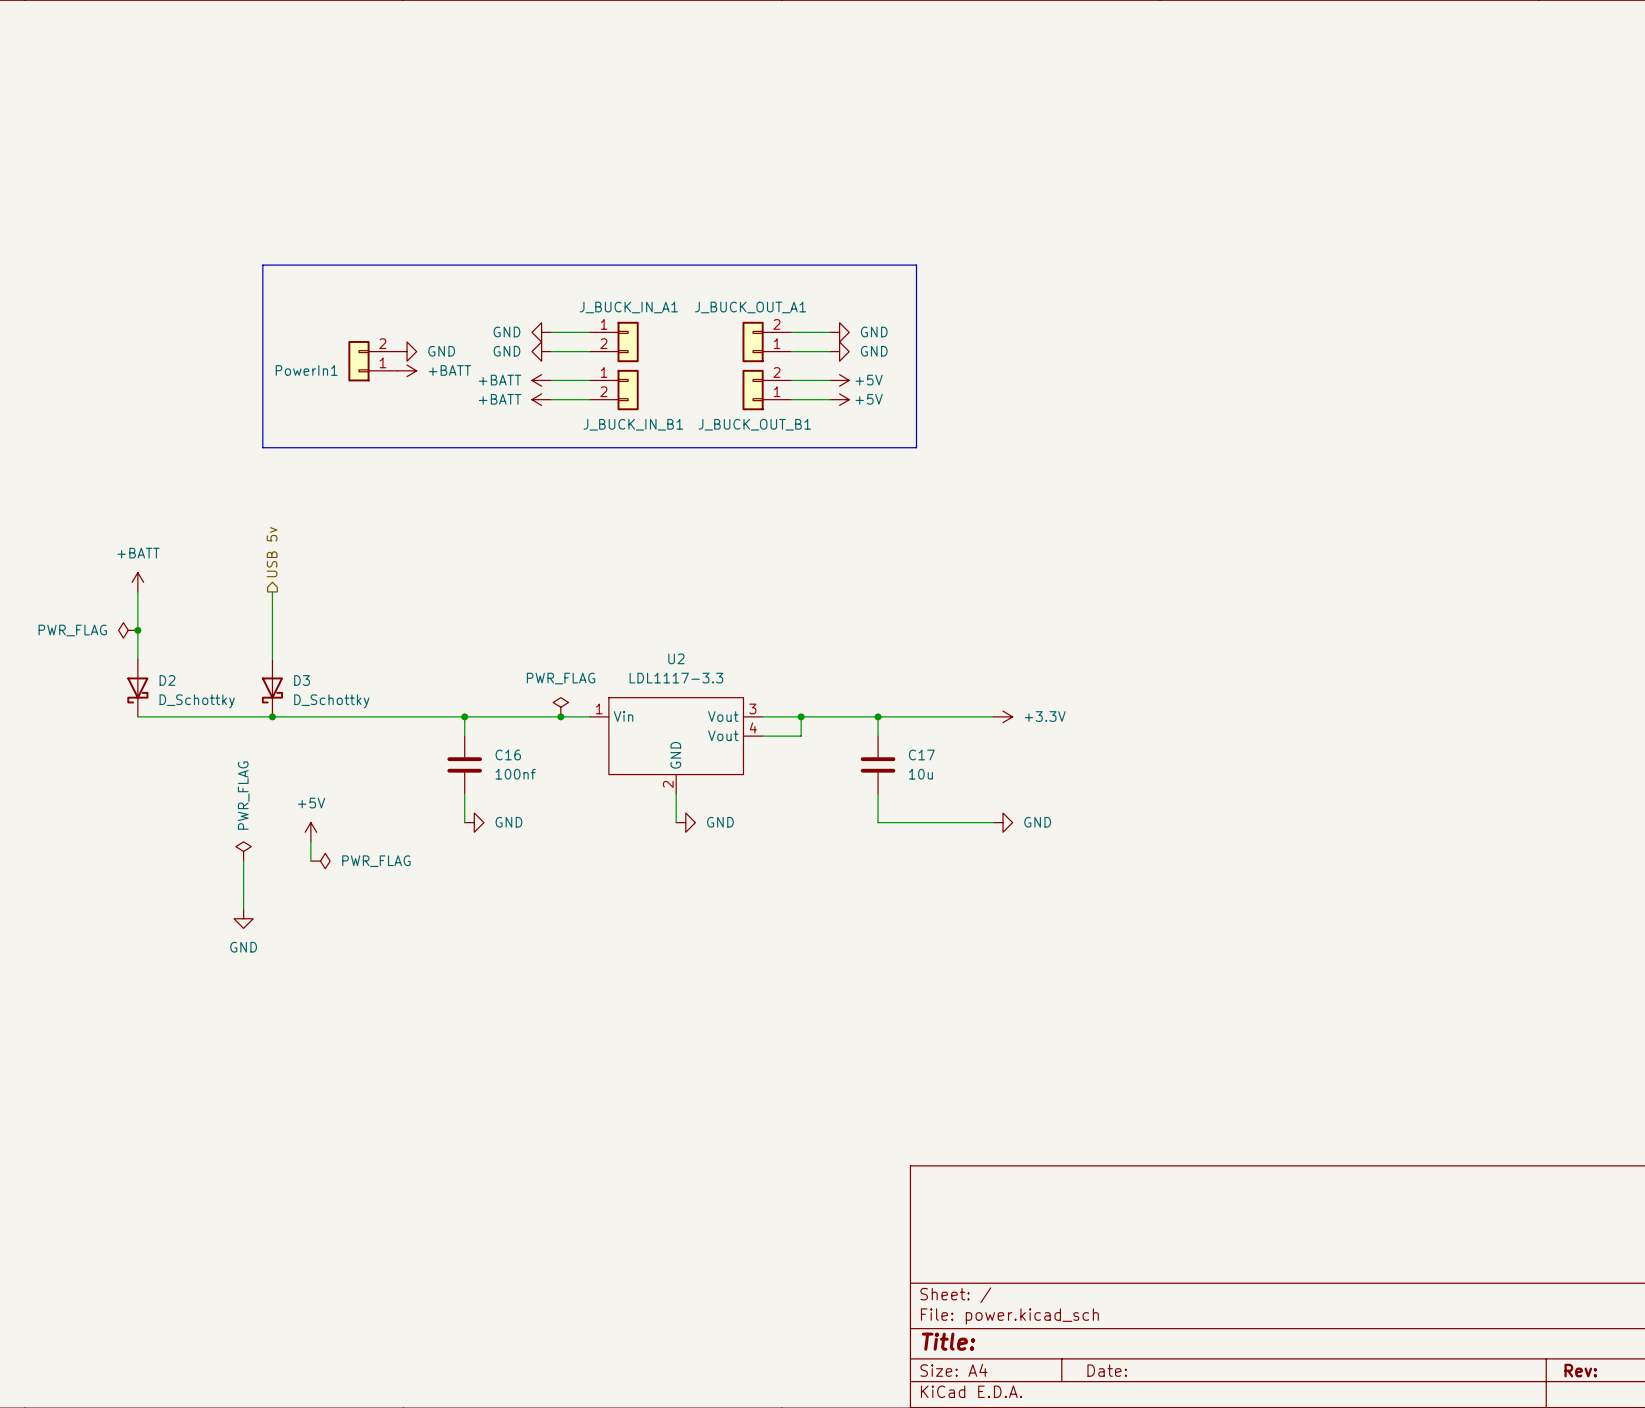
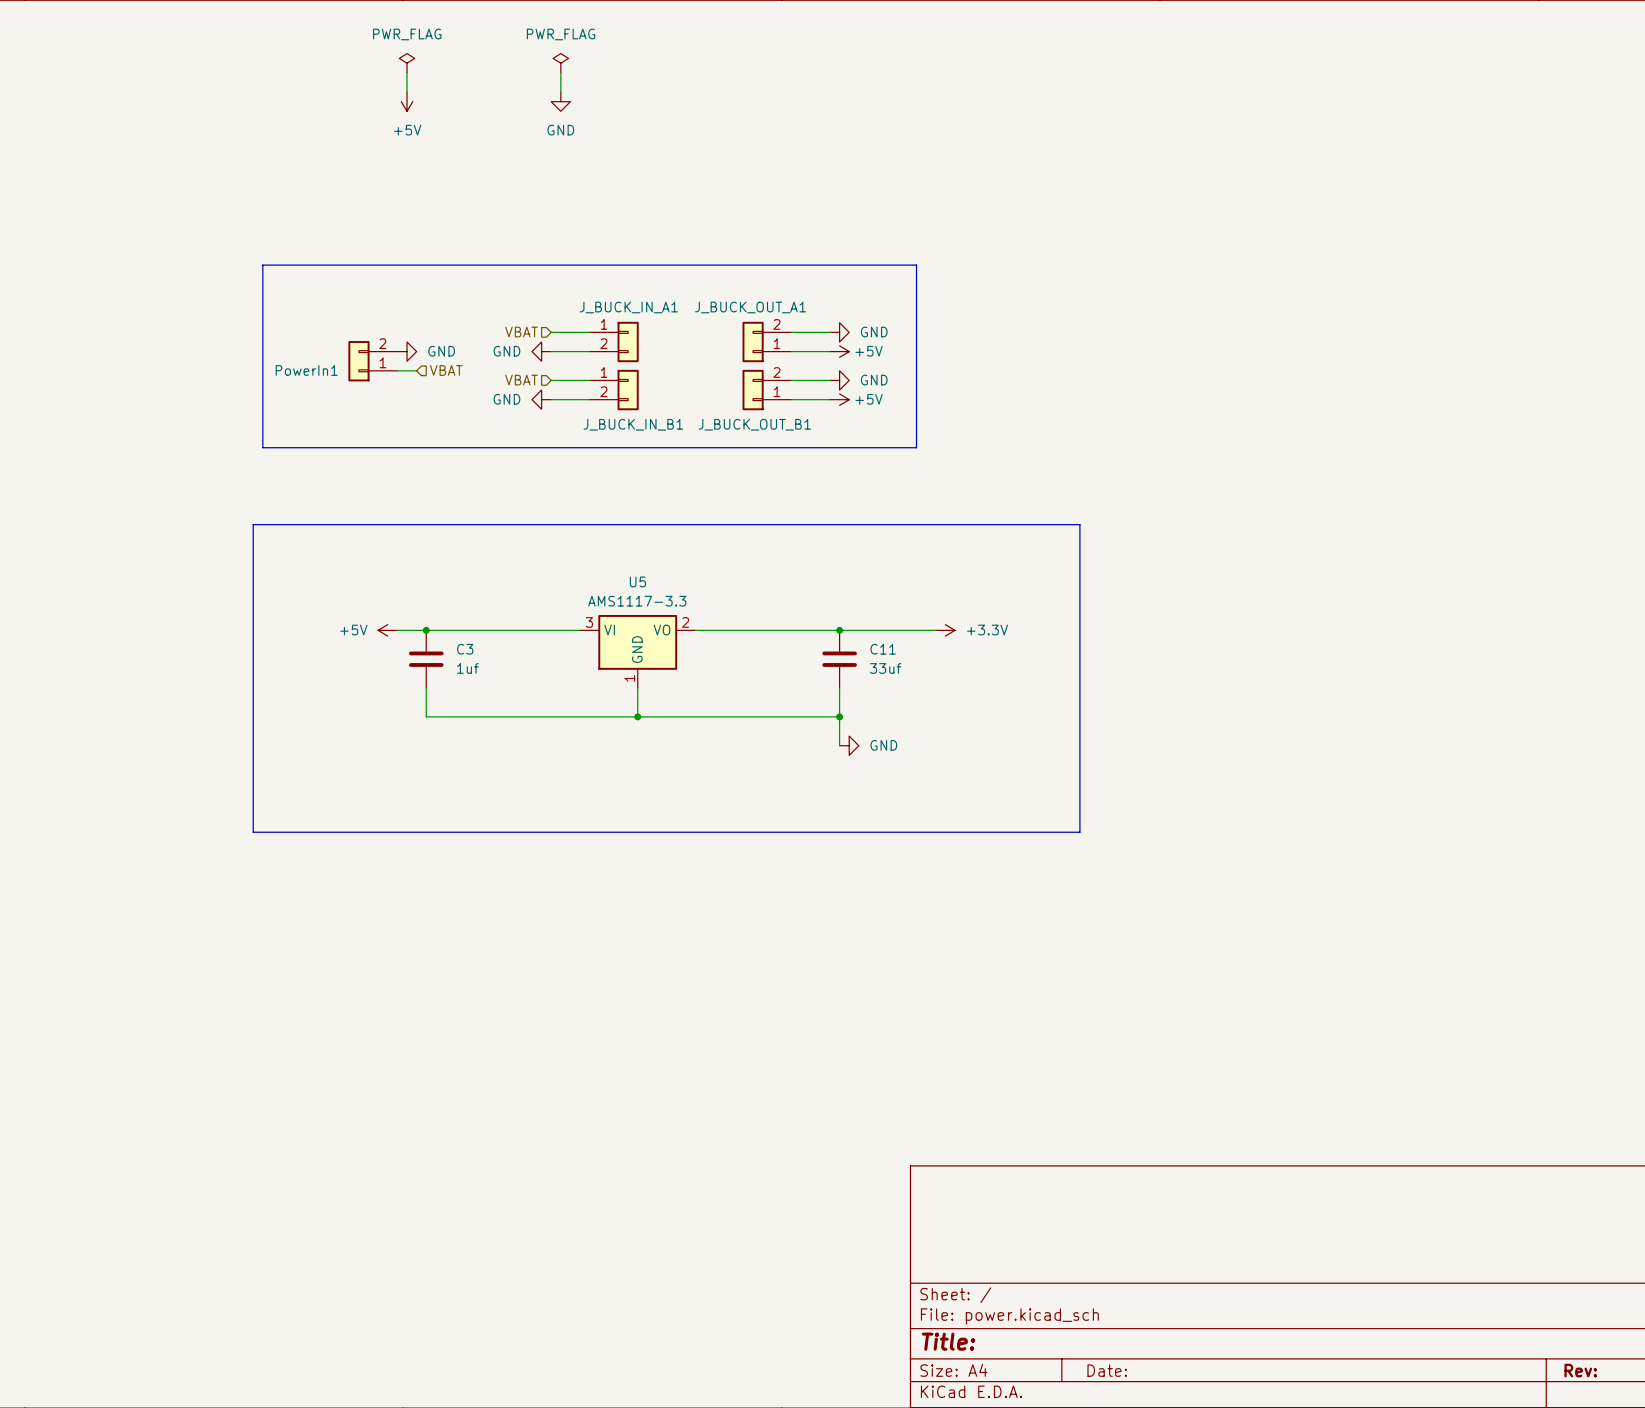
power symbol: none -> PWR_FLAG (407, 63)
power symbol: none -> PWR_FLAG (560, 63)
wire: none -> (407, 72) (407, 92)
wire: none -> (560, 72) (560, 92)
power symbol: none -> +5V (407, 101)
power symbol: none -> GND (560, 101)
hierarchical label: none -> VBAT (521, 332)
power symbol: GND (541, 332) -> none
power symbol: GND (839, 351) -> +5V (839, 351)
power symbol: +BATT (407, 370) -> none
hierarchical label: none -> VBAT (446, 370)
hierarchical label: none -> VBAT (521, 380)
power symbol: +BATT (541, 380) -> none
power symbol: +5V (839, 380) -> GND (839, 380)
power symbol: +BATT (541, 399) -> GND (541, 399)
line: none -> (253, 524) (1079, 524) (1079, 832) (253, 832) (253, 524)
hierarchical label: USB 5v (272, 552) -> none
power symbol: +BATT (137, 582) -> none
wire: (137, 591) (137, 659) -> none
wire: (272, 591) (272, 659) -> none
power symbol: PWR_FLAG (128, 630) -> none
junction: (137, 630) -> none
power symbol: none -> +5V (387, 630)
wire: none -> (397, 630) (580, 630)
junction: none -> (426, 630)
wire: none -> (695, 630) (935, 630)
junction: none -> (839, 630)
U5: none -> AMS1117-3.3 (637, 651)
C3: none -> 1uf (426, 659)
C11: none -> 33uf (839, 659)
D2: D_Schottky (137, 688) -> none
D3: D_Schottky (272, 688) -> none
wire: none -> (839, 688) (839, 745)
power symbol: PWR_FLAG (560, 707) -> none
wire: (137, 716) (426, 716) -> (426, 688) (426, 716)
junction: (272, 716) -> none
wire: (464, 716) (464, 736) -> none
junction: (464, 716) -> none
junction: (560, 716) -> none
wire: none -> (589, 716) (762, 716)
junction: none -> (637, 716)
wire: (801, 716) (801, 736) (762, 736) -> none
junction: (801, 716) -> none
wire: (839, 716) (993, 716) -> none
junction: none -> (839, 716)
wire: (878, 716) (878, 736) -> none
junction: (878, 716) -> none
power symbol position: +3.3V (1003, 716) -> +3.3V (945, 630)
U2: LDL1117-3.3 (676, 745) -> none
power symbol: none -> GND (849, 745)
C16: 100nf (464, 764) -> none
C17: 10u (878, 764) -> none
wire: (464, 793) (464, 822) -> none
wire: (676, 793) (676, 822) -> (637, 688) (637, 716)
wire: (878, 793) (878, 822) (993, 822) -> none
power symbol: GND (474, 822) -> none
power symbol: GND (685, 822) -> none
power symbol: GND (1003, 822) -> none
power symbol: +5V (310, 832) -> none
wire: (310, 841) (310, 861) -> none
power symbol: PWR_FLAG (243, 851) -> none
wire: (243, 861) (243, 909) -> none
power symbol: PWR_FLAG (320, 861) -> none
power symbol: GND (243, 918) -> none

